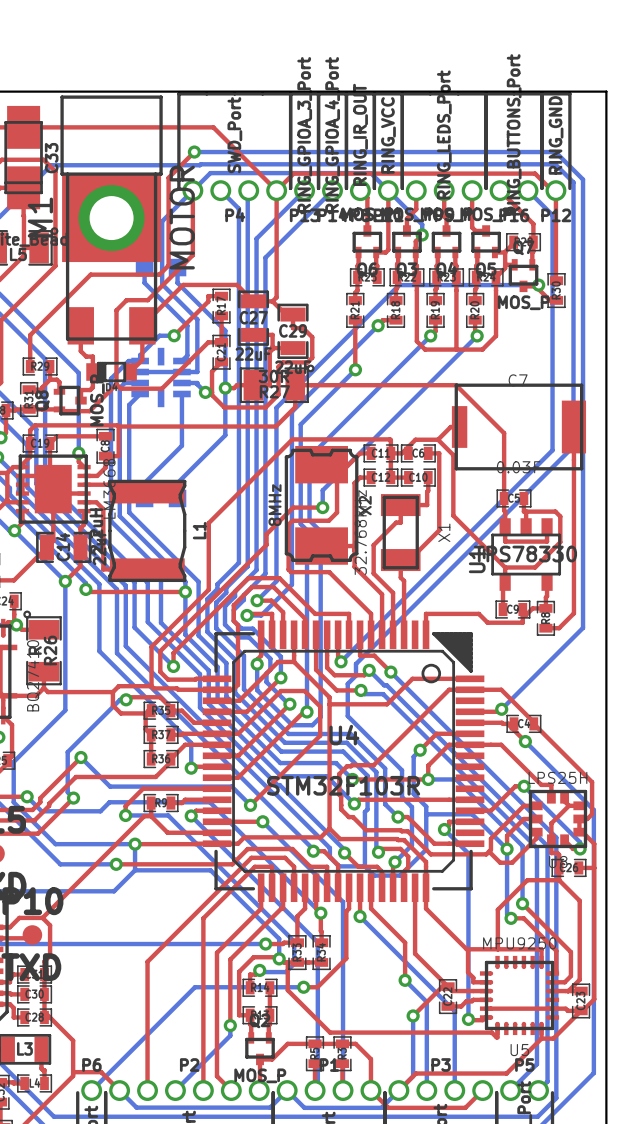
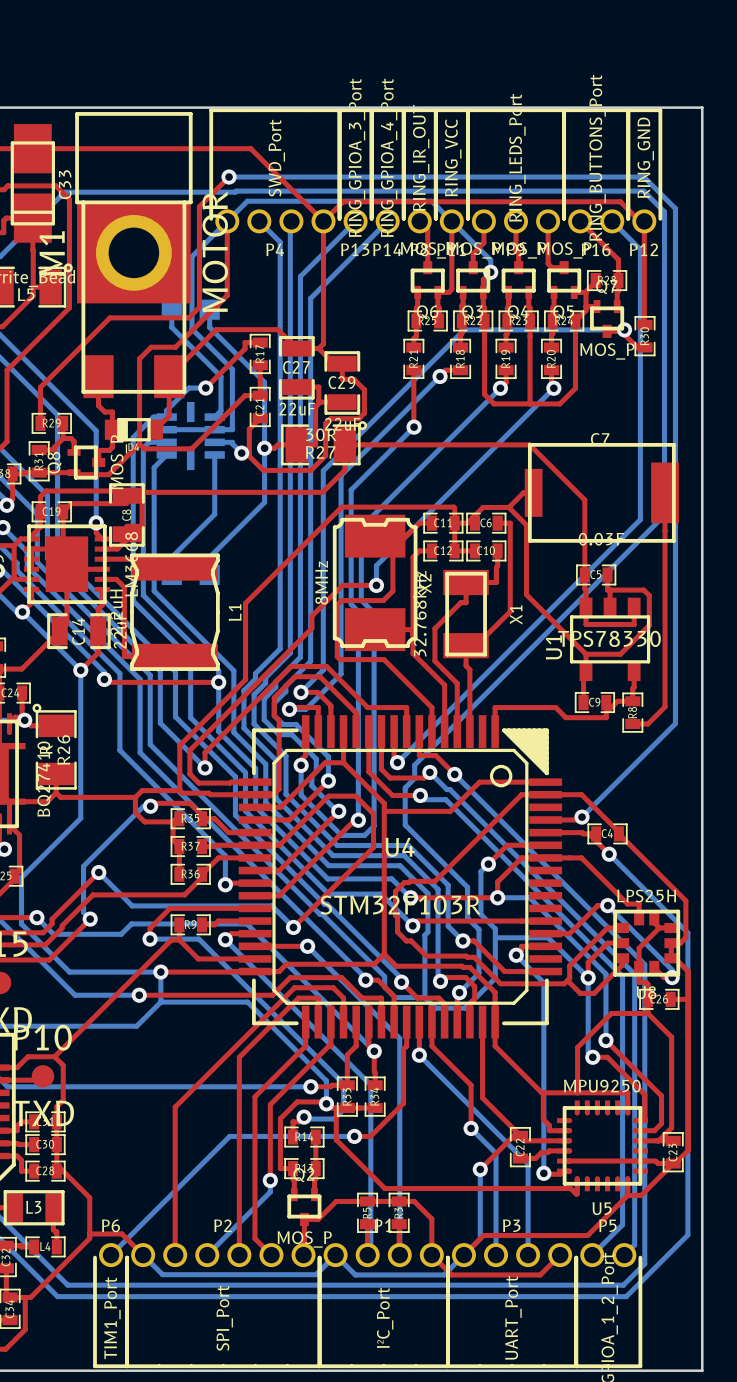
C8 footprint: [96, 428, 115, 464] -> [109, 483, 145, 547]

